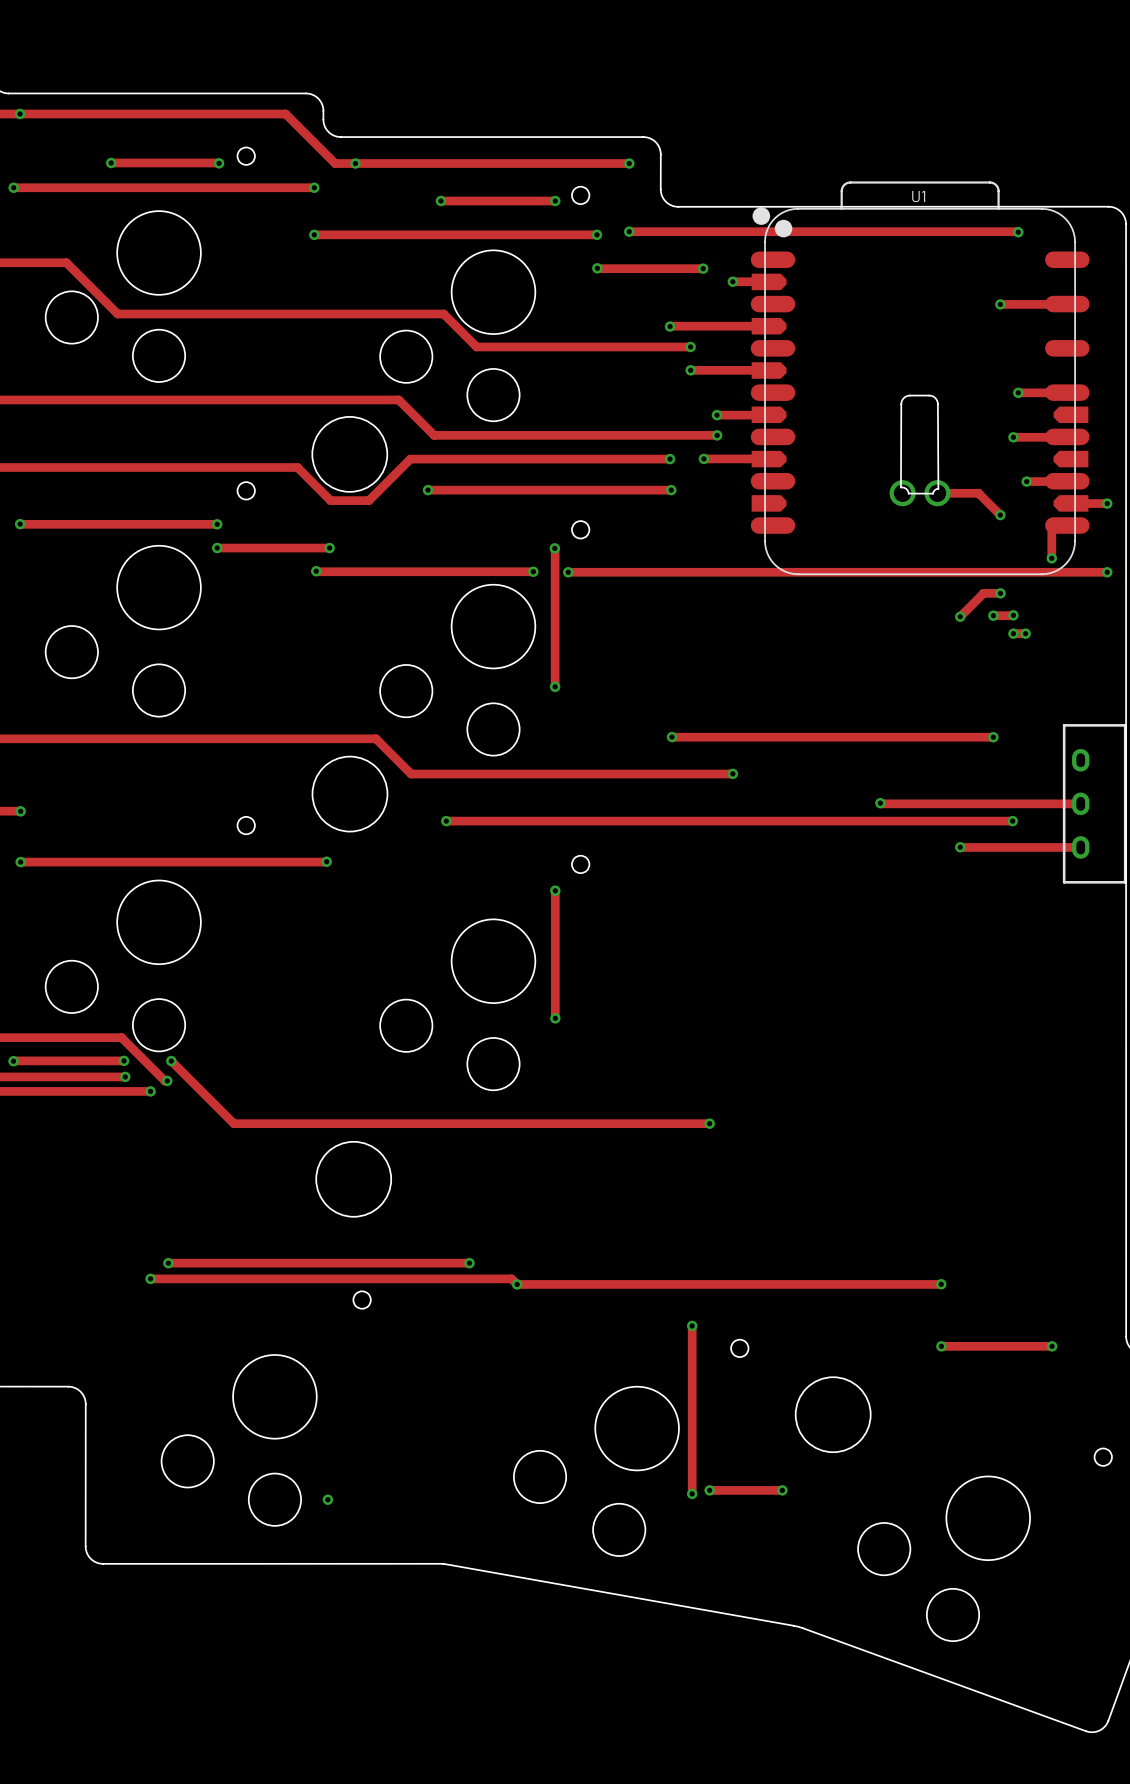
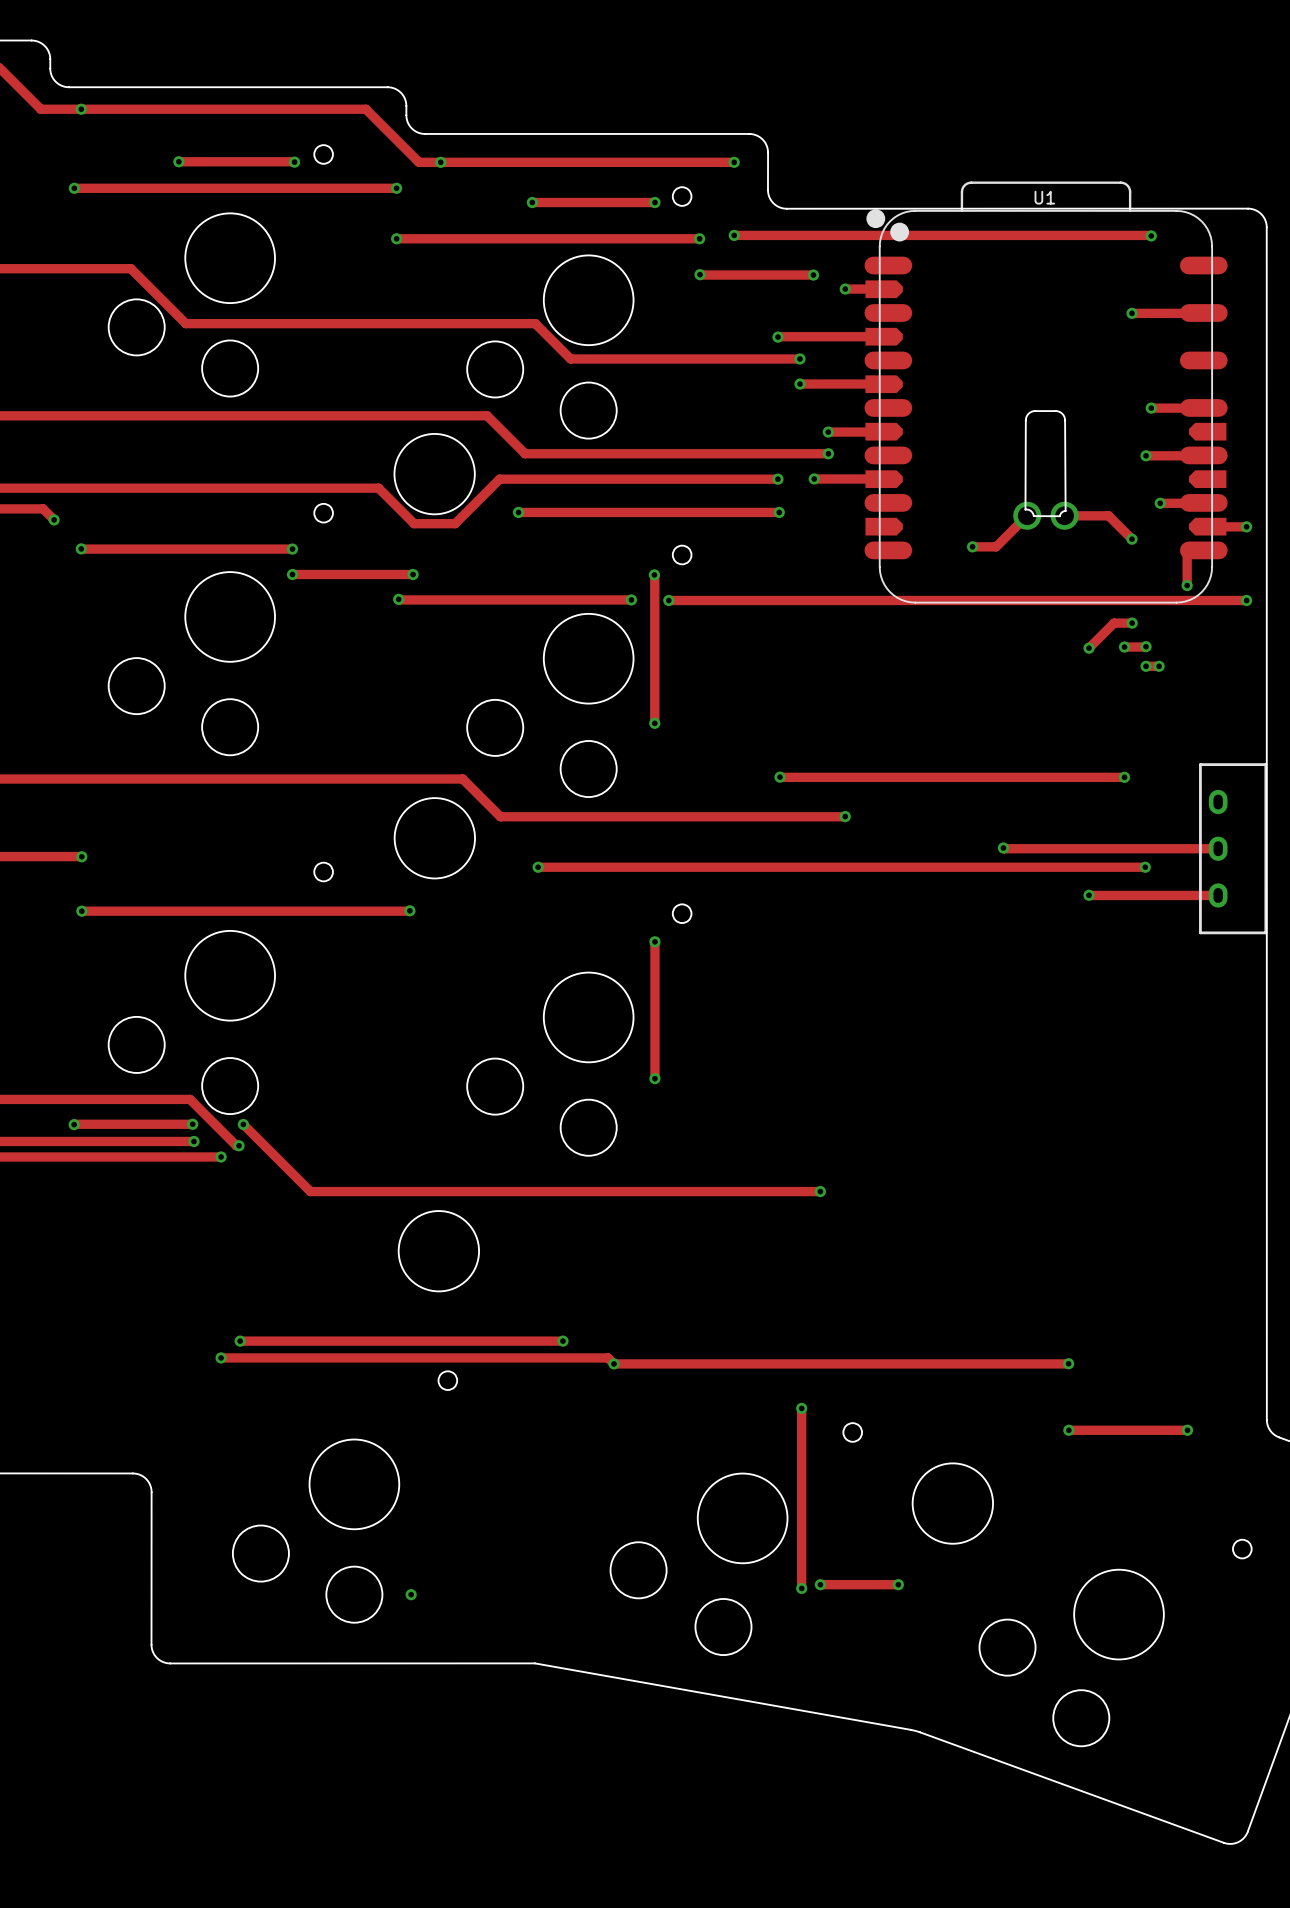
track: none -> (1027, 515) (996, 546) (972, 546)
via: none -> (972, 546)

